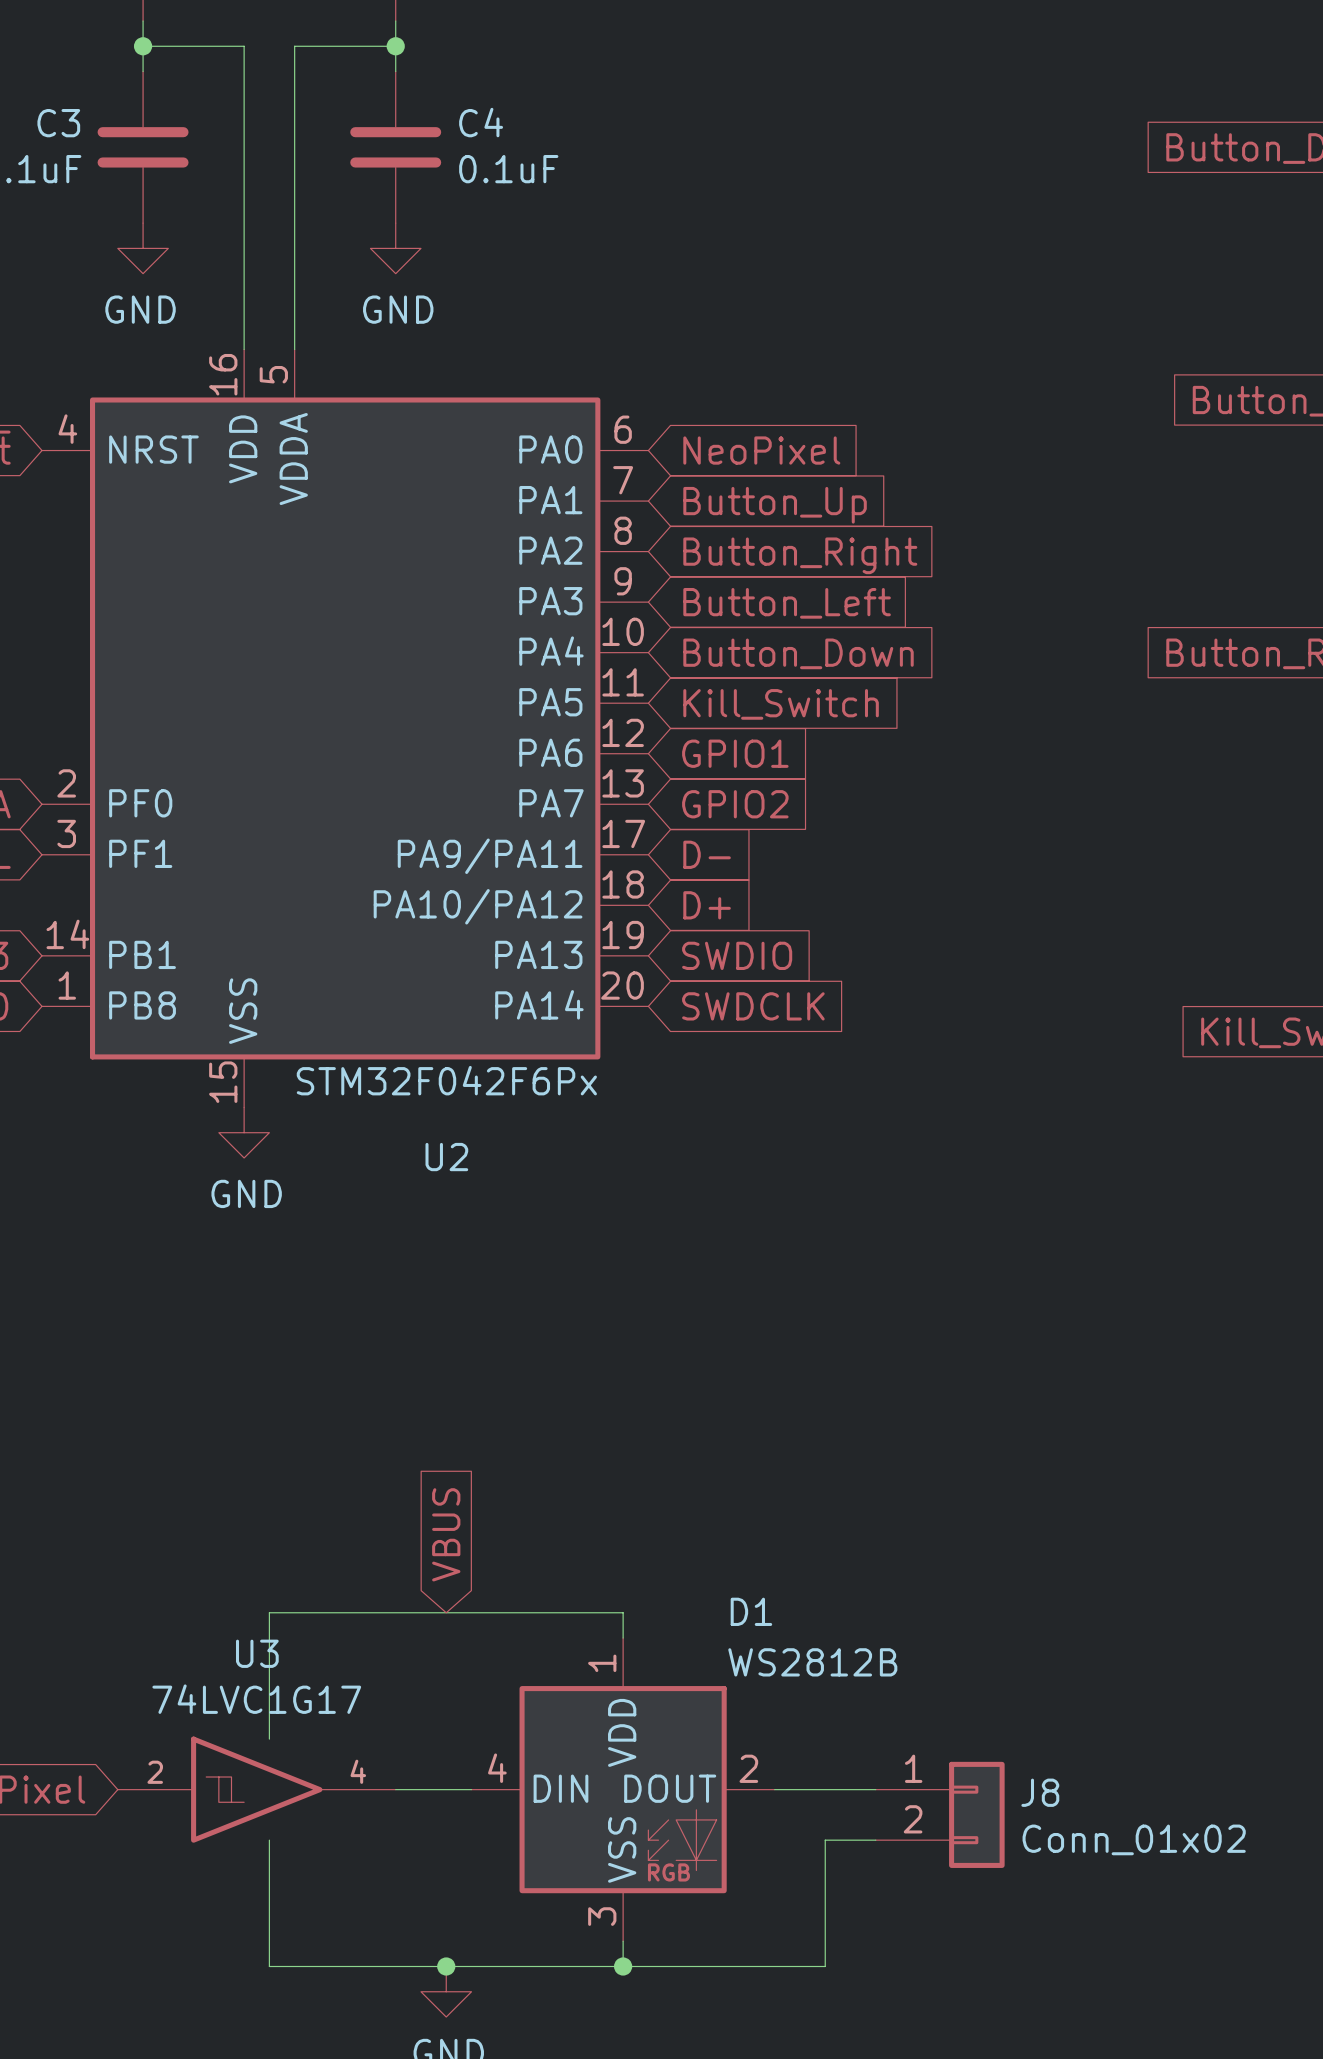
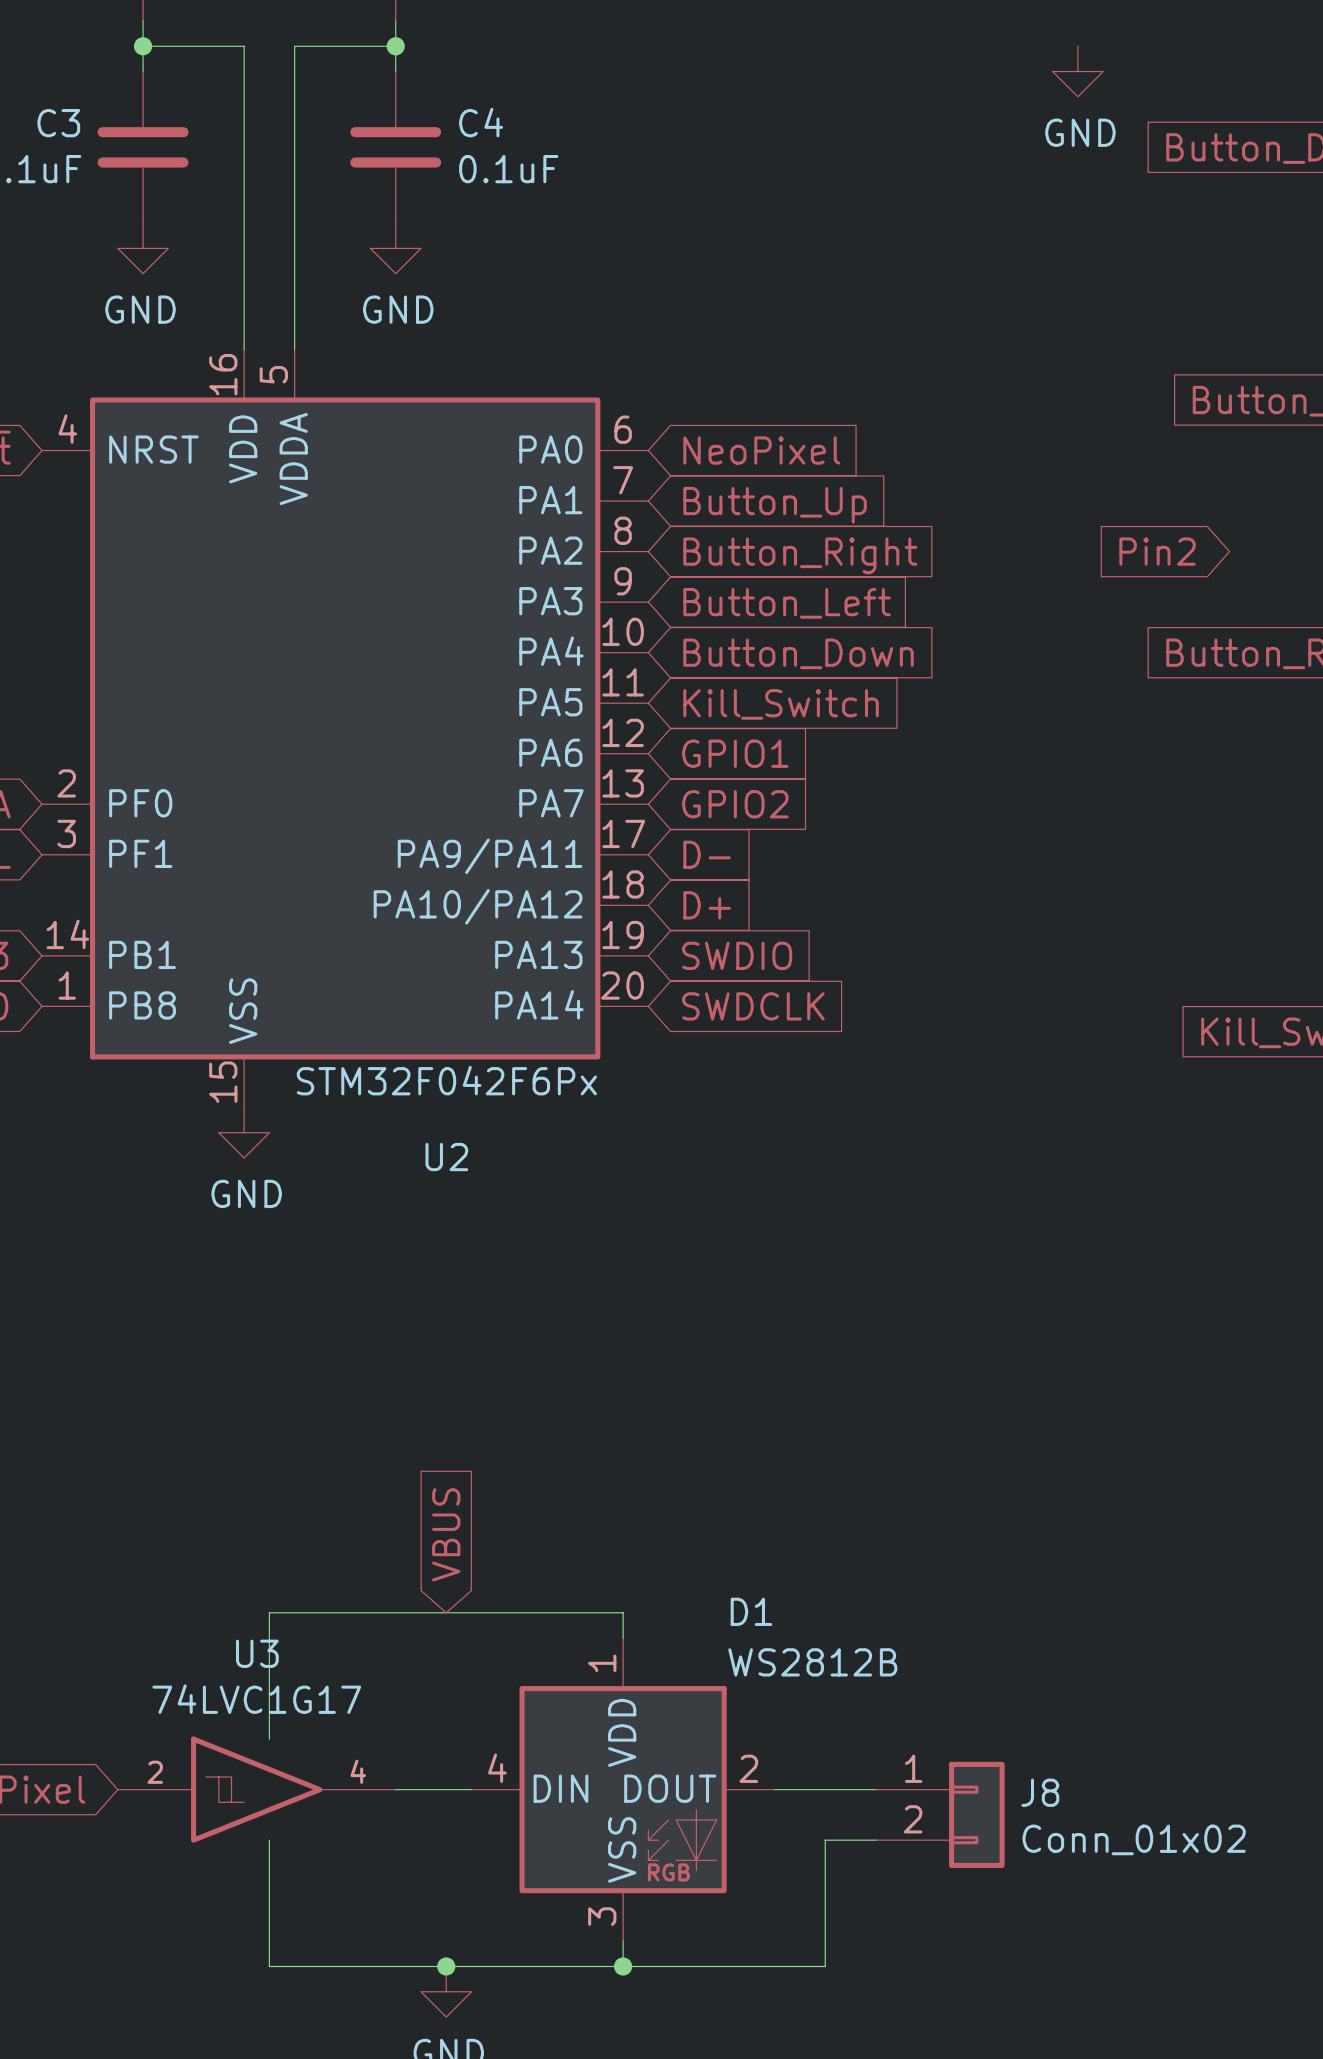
power symbol: none -> GND (1077, 71)
global label: none -> Pin2 (1157, 551)

